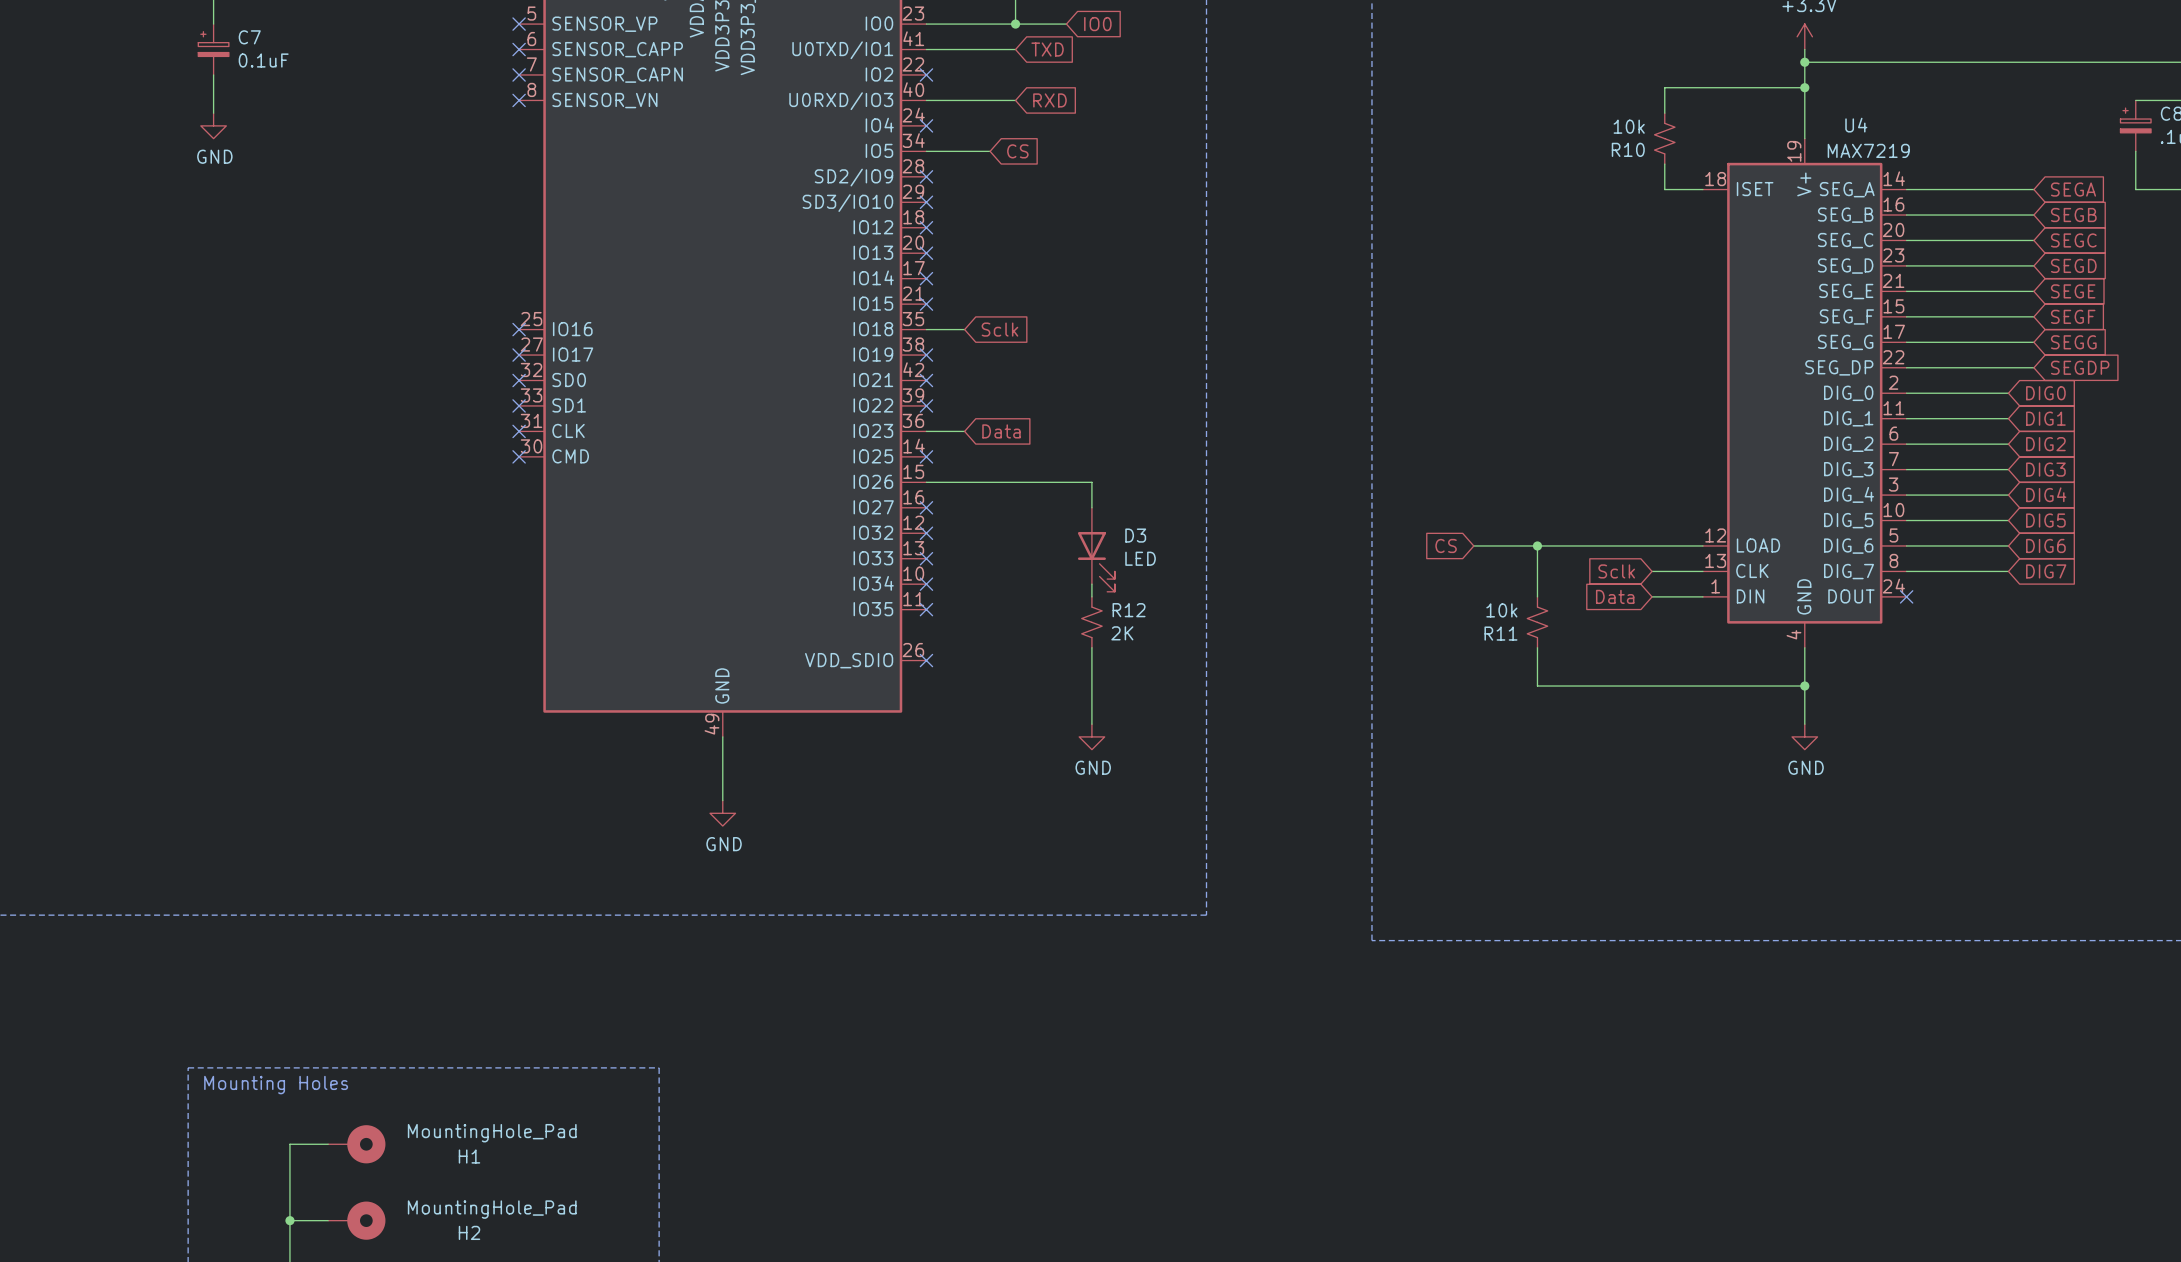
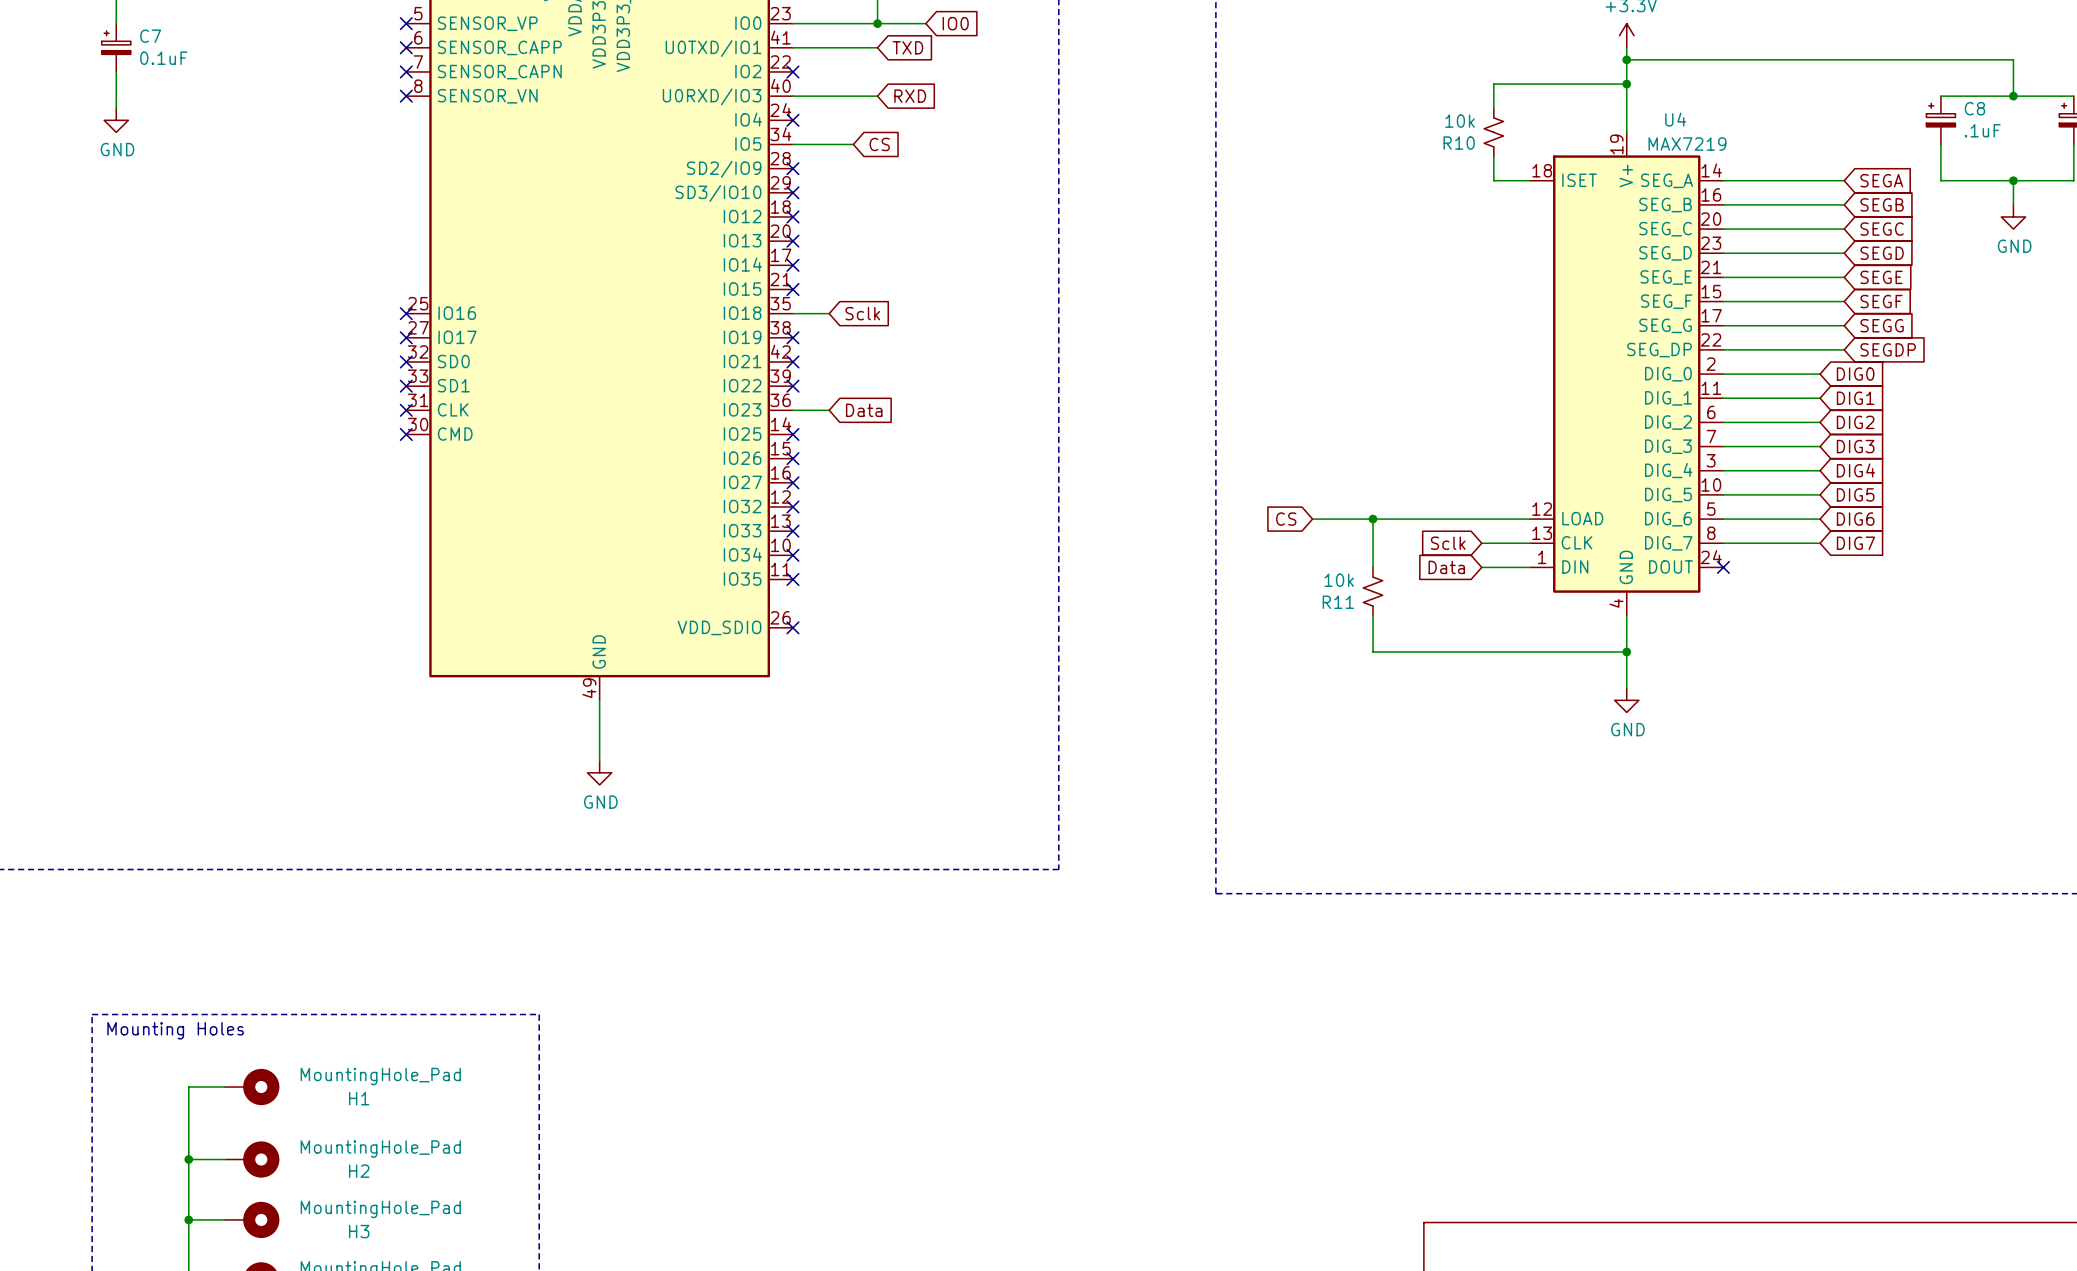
wire: (926, 482) (1091, 482) (1091, 507) -> none
no-connect mark: none -> (792, 458)
D3: LED (1096, 549) -> none
wire: (1091, 584) (1091, 596) -> none
R12: 2K (1091, 622) -> none
wire: (1091, 647) (1091, 724) -> none
power symbol: GND (1091, 736) -> none

